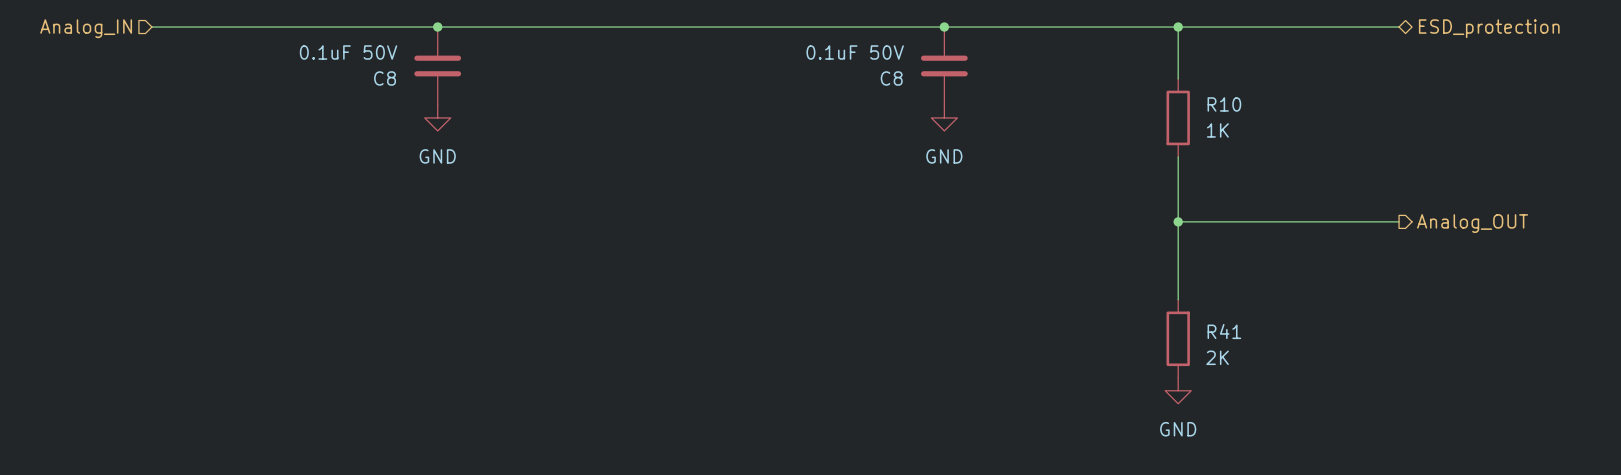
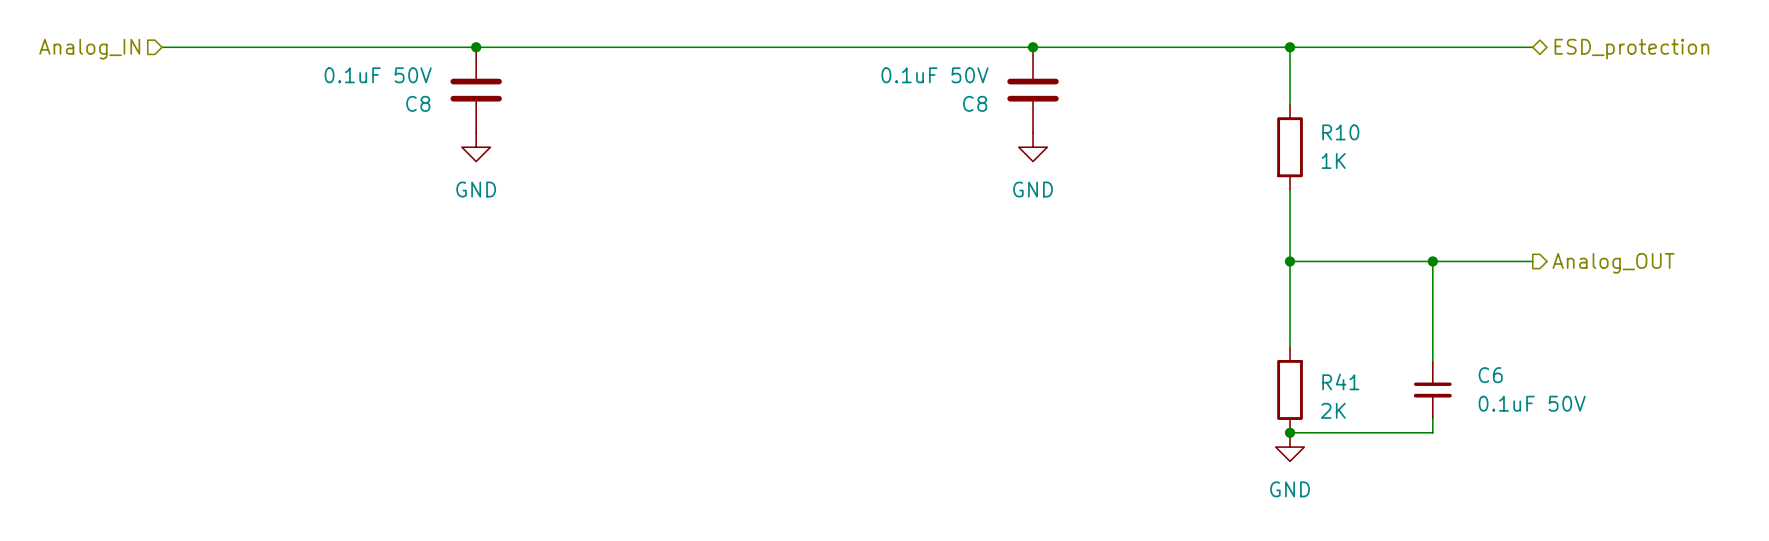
wire: none -> (1432, 261) (1432, 361)
junction: none -> (1432, 261)
C6: none -> 0.1uF 50V (1432, 389)
wire: none -> (1432, 418) (1432, 432) (1290, 432)
junction: none -> (1290, 432)

